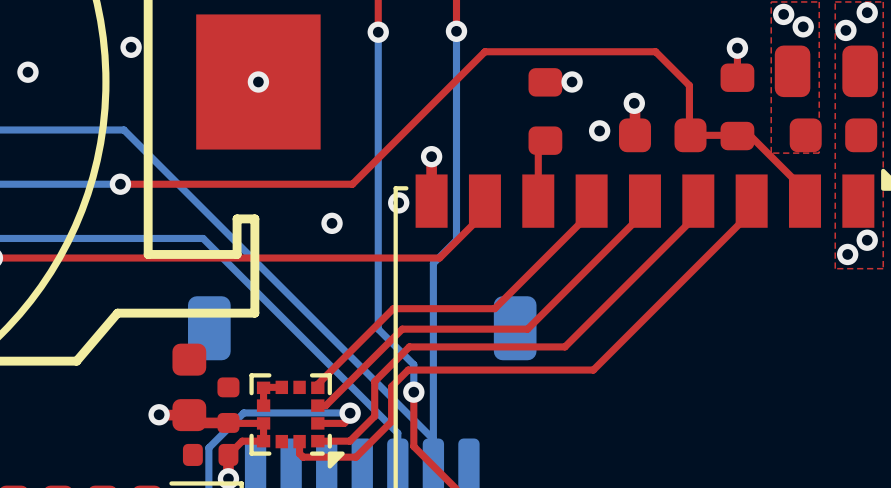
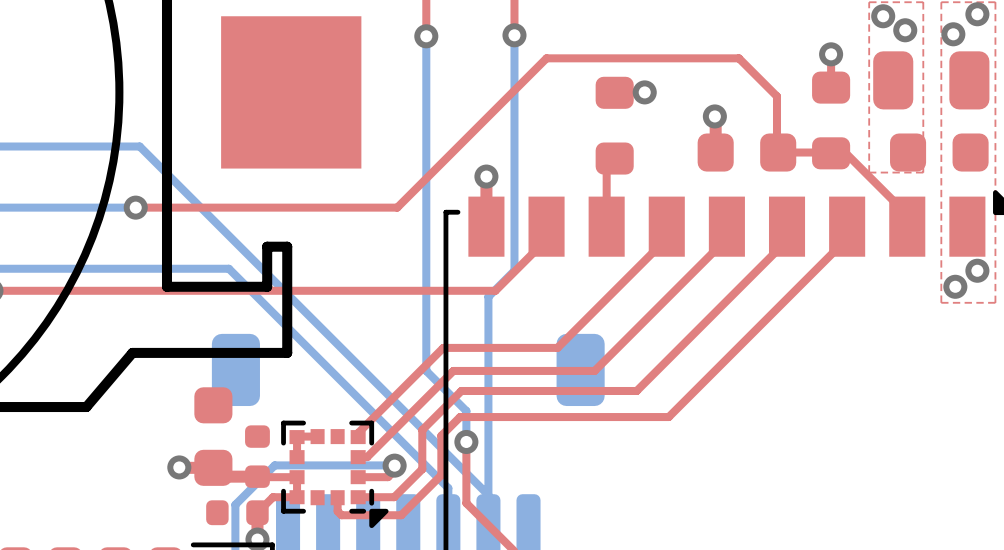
via: (131, 47) -> none
via: (27, 72) -> none
via: (258, 81) -> none
via: (599, 130) -> none
via: (398, 202) -> none
via: (332, 223) -> none

